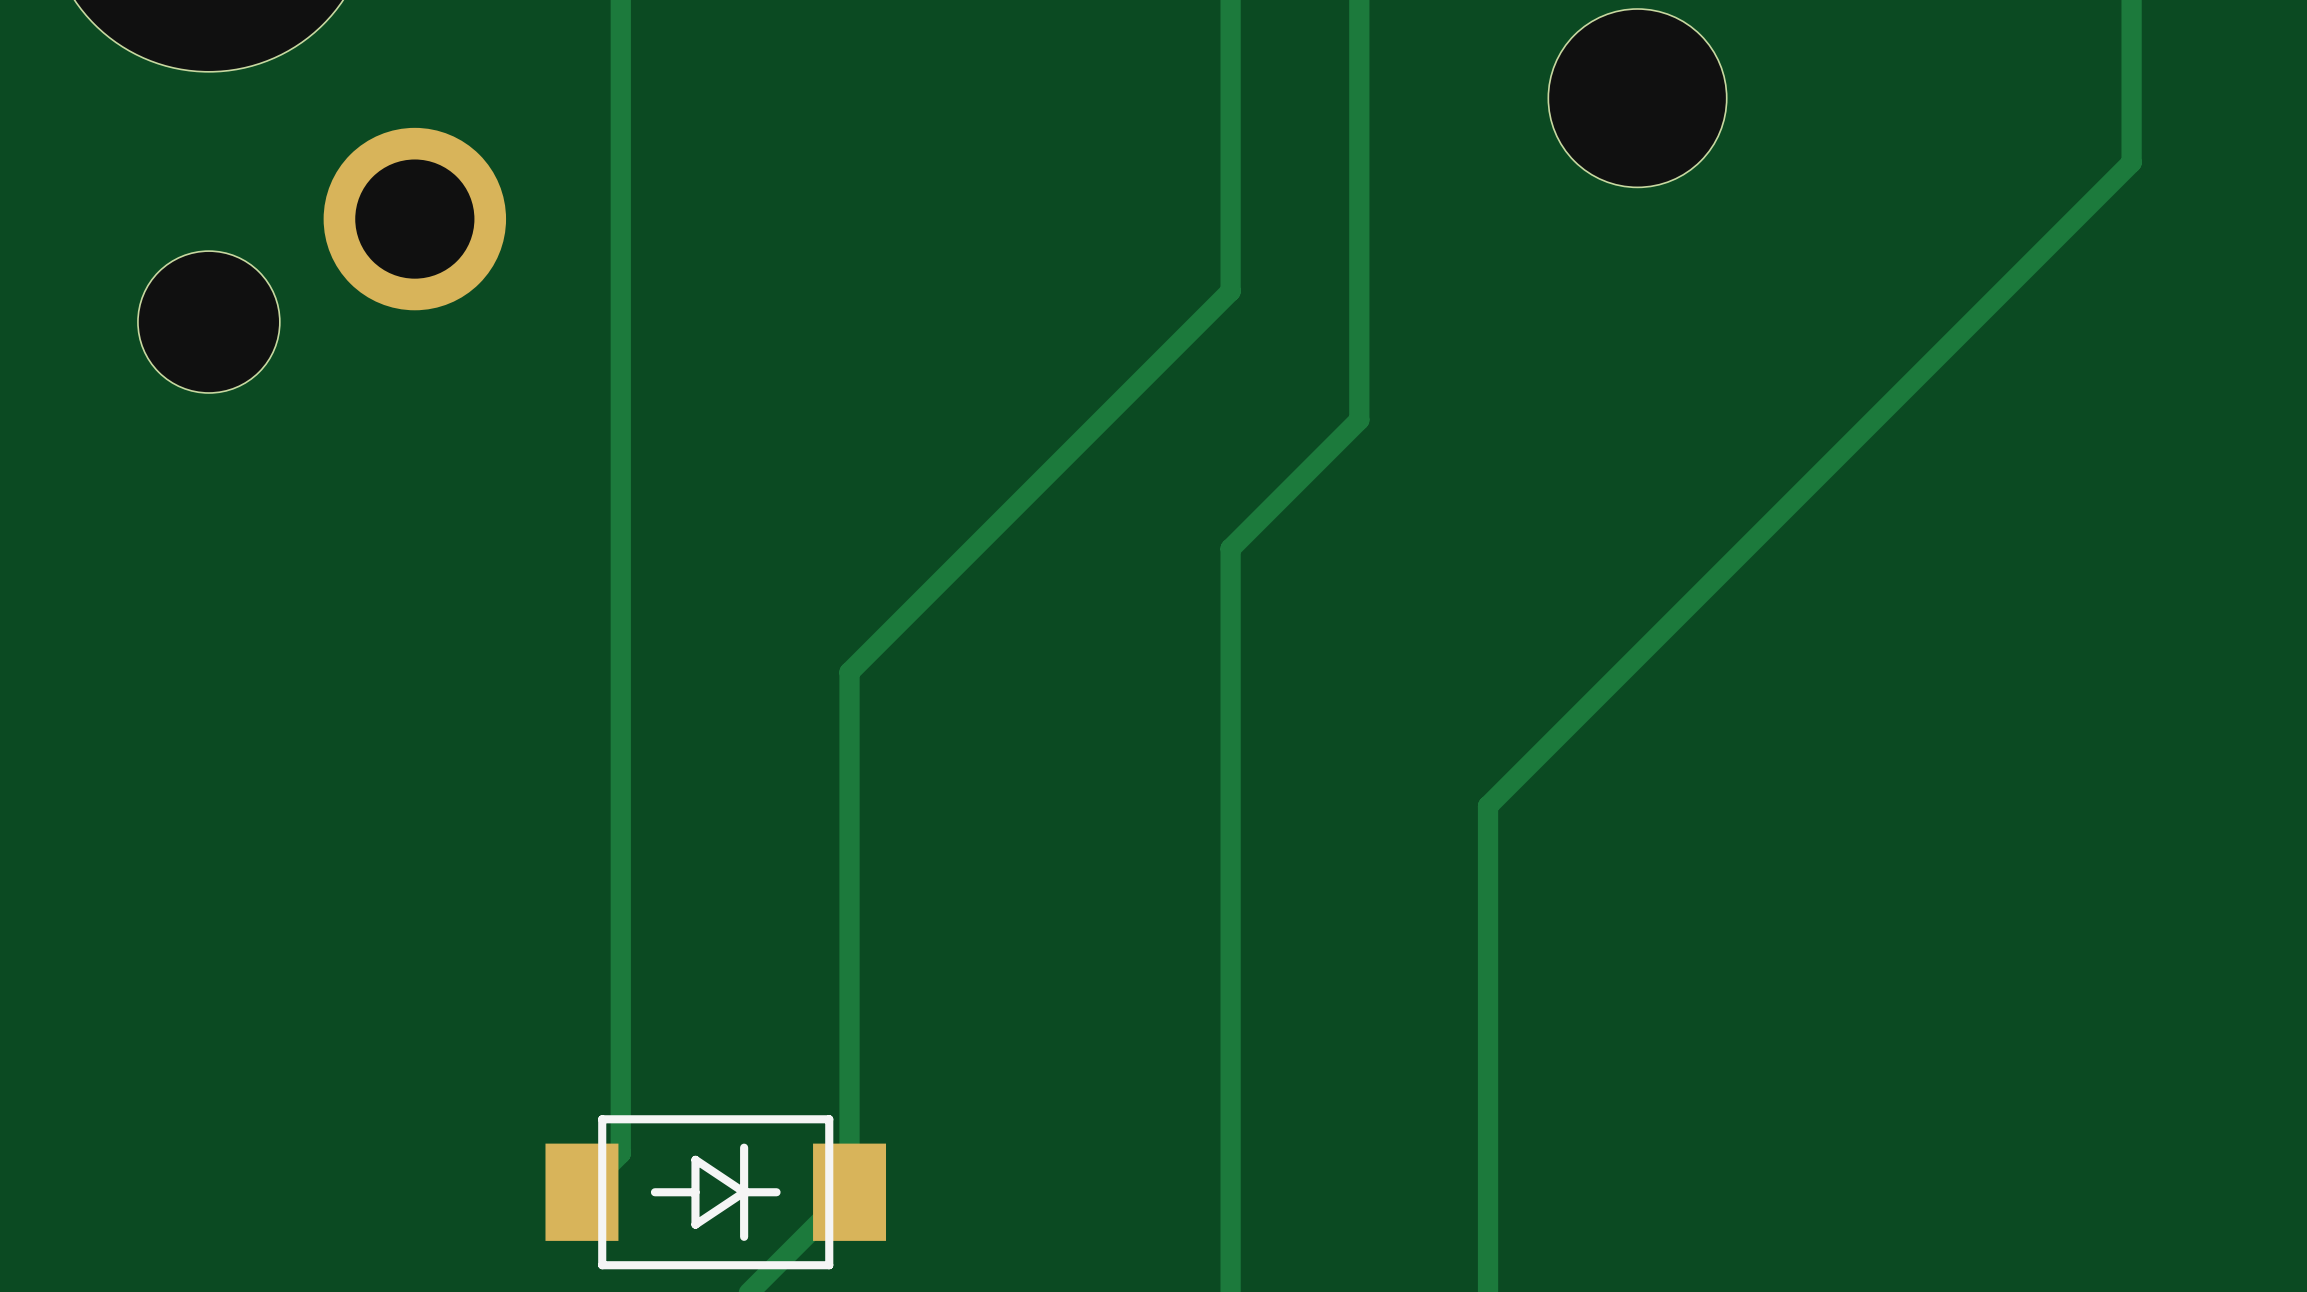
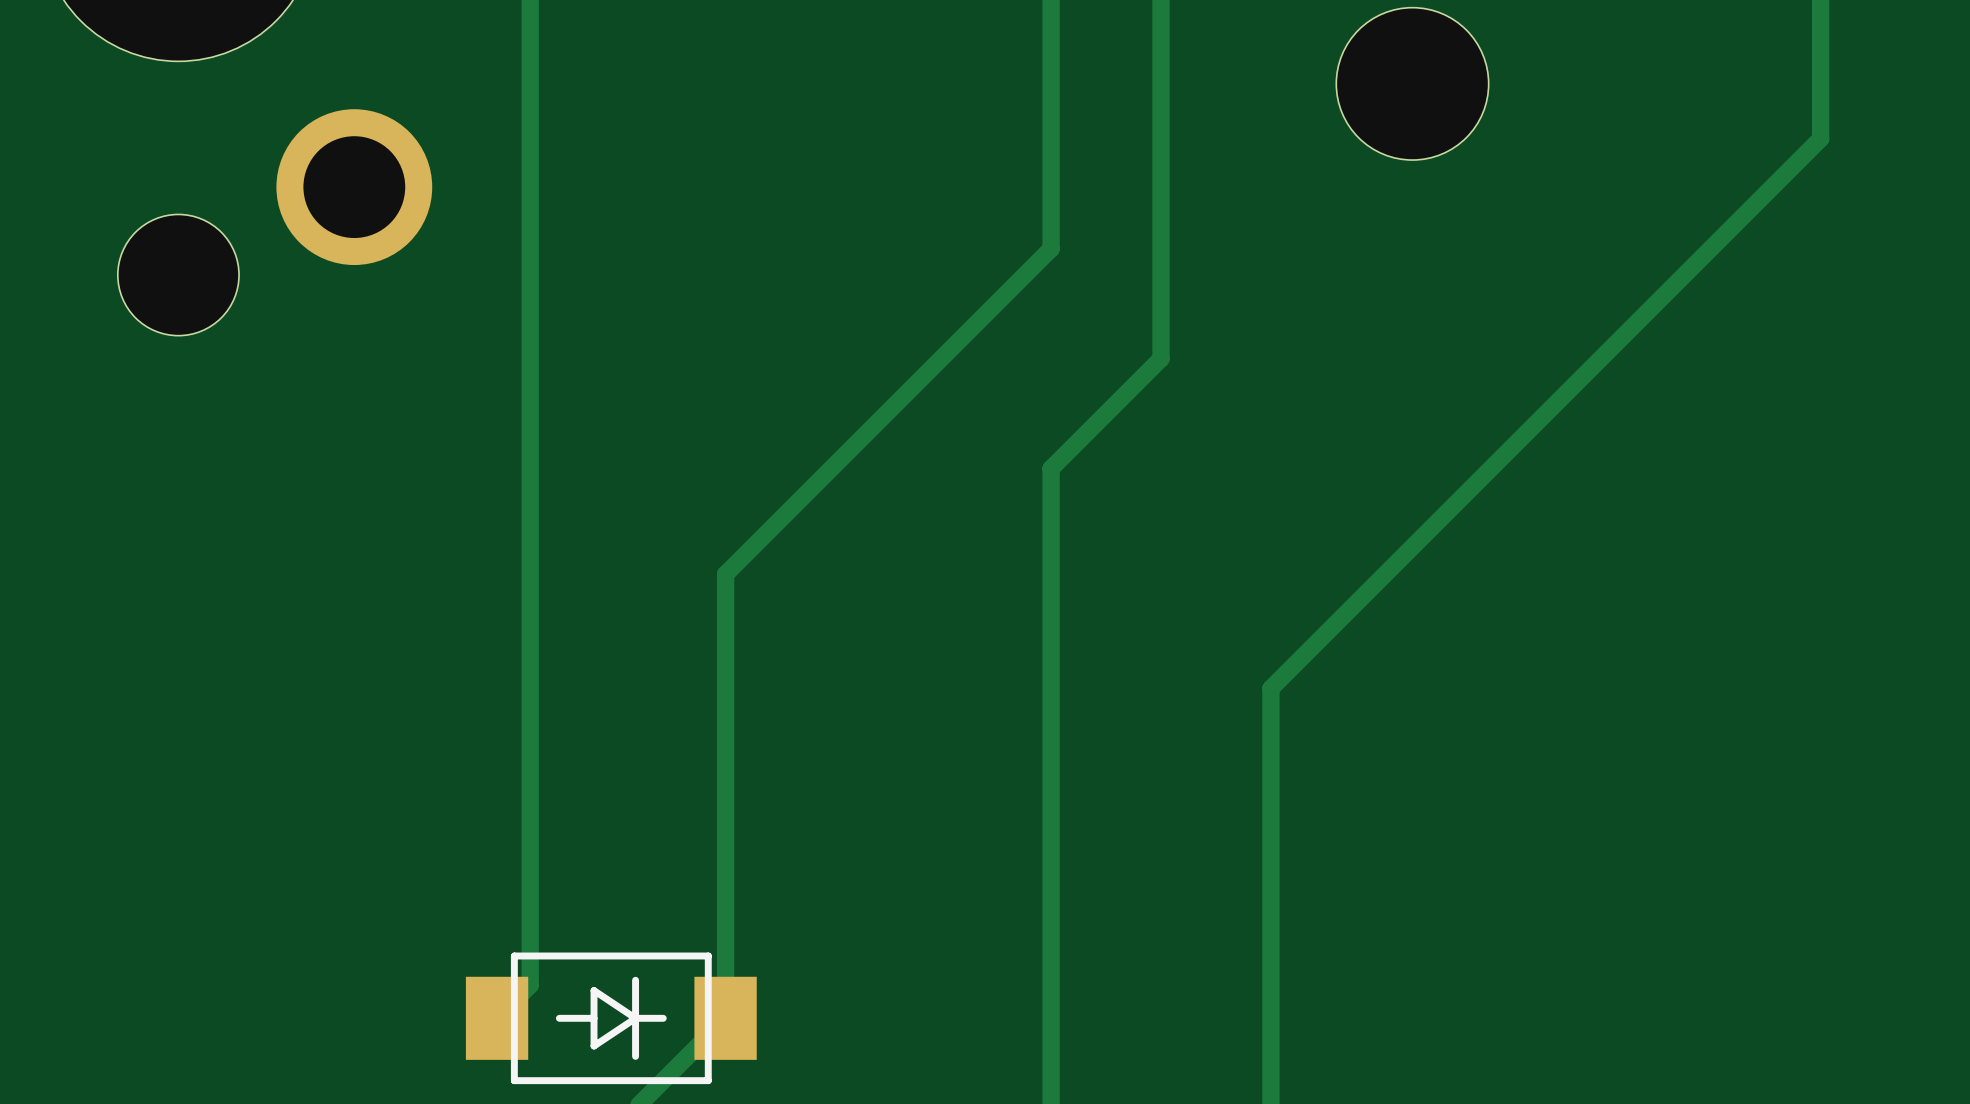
part position: (1637, 98) -> (1412, 83)

